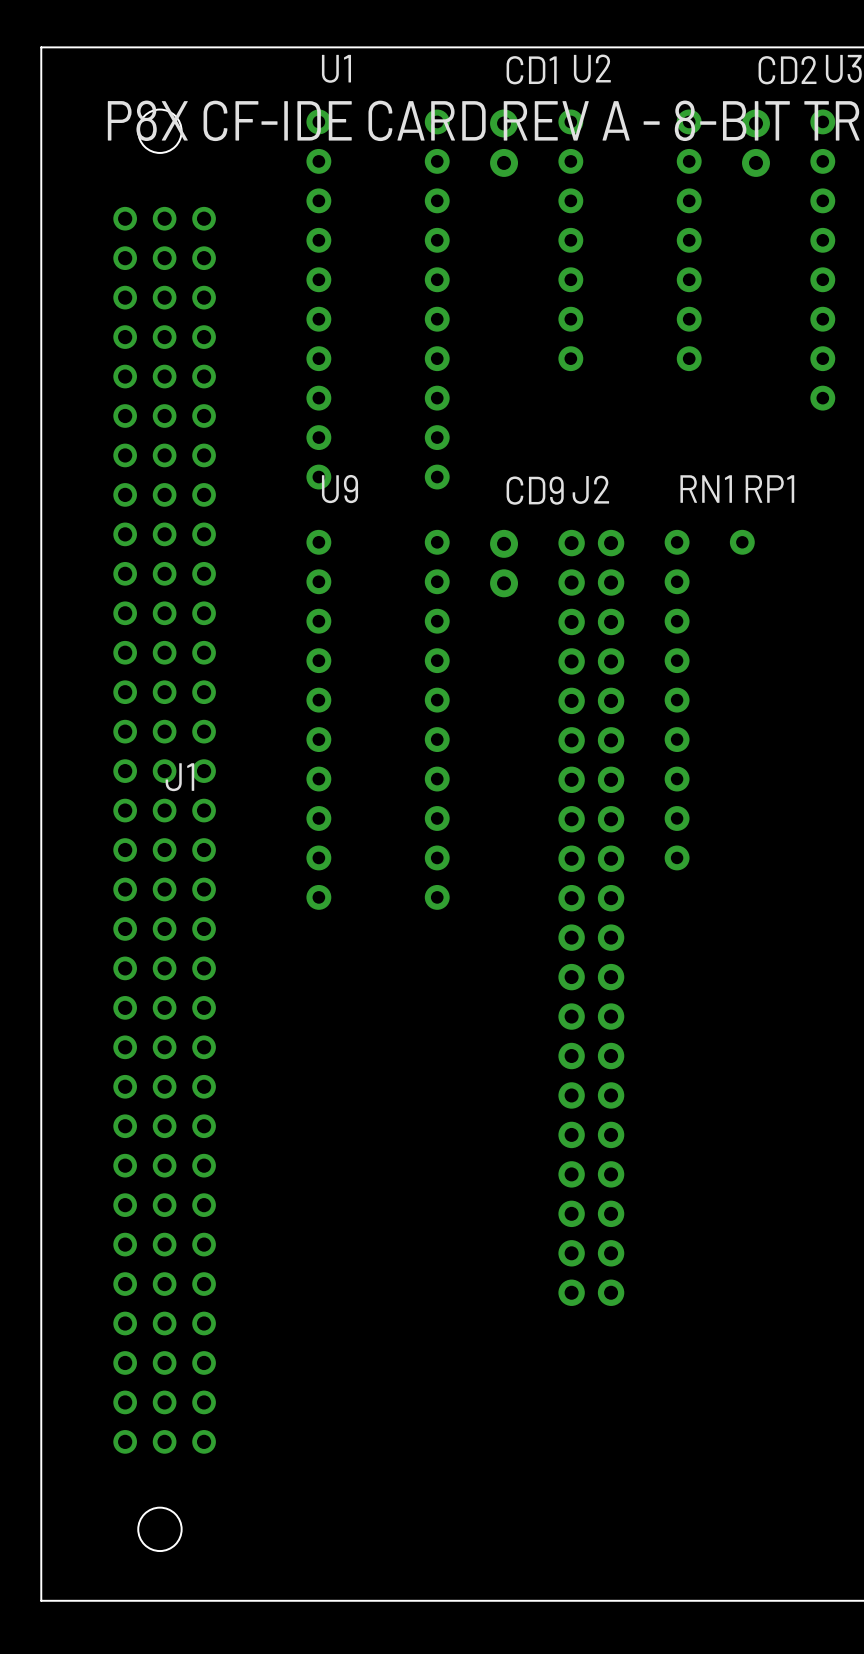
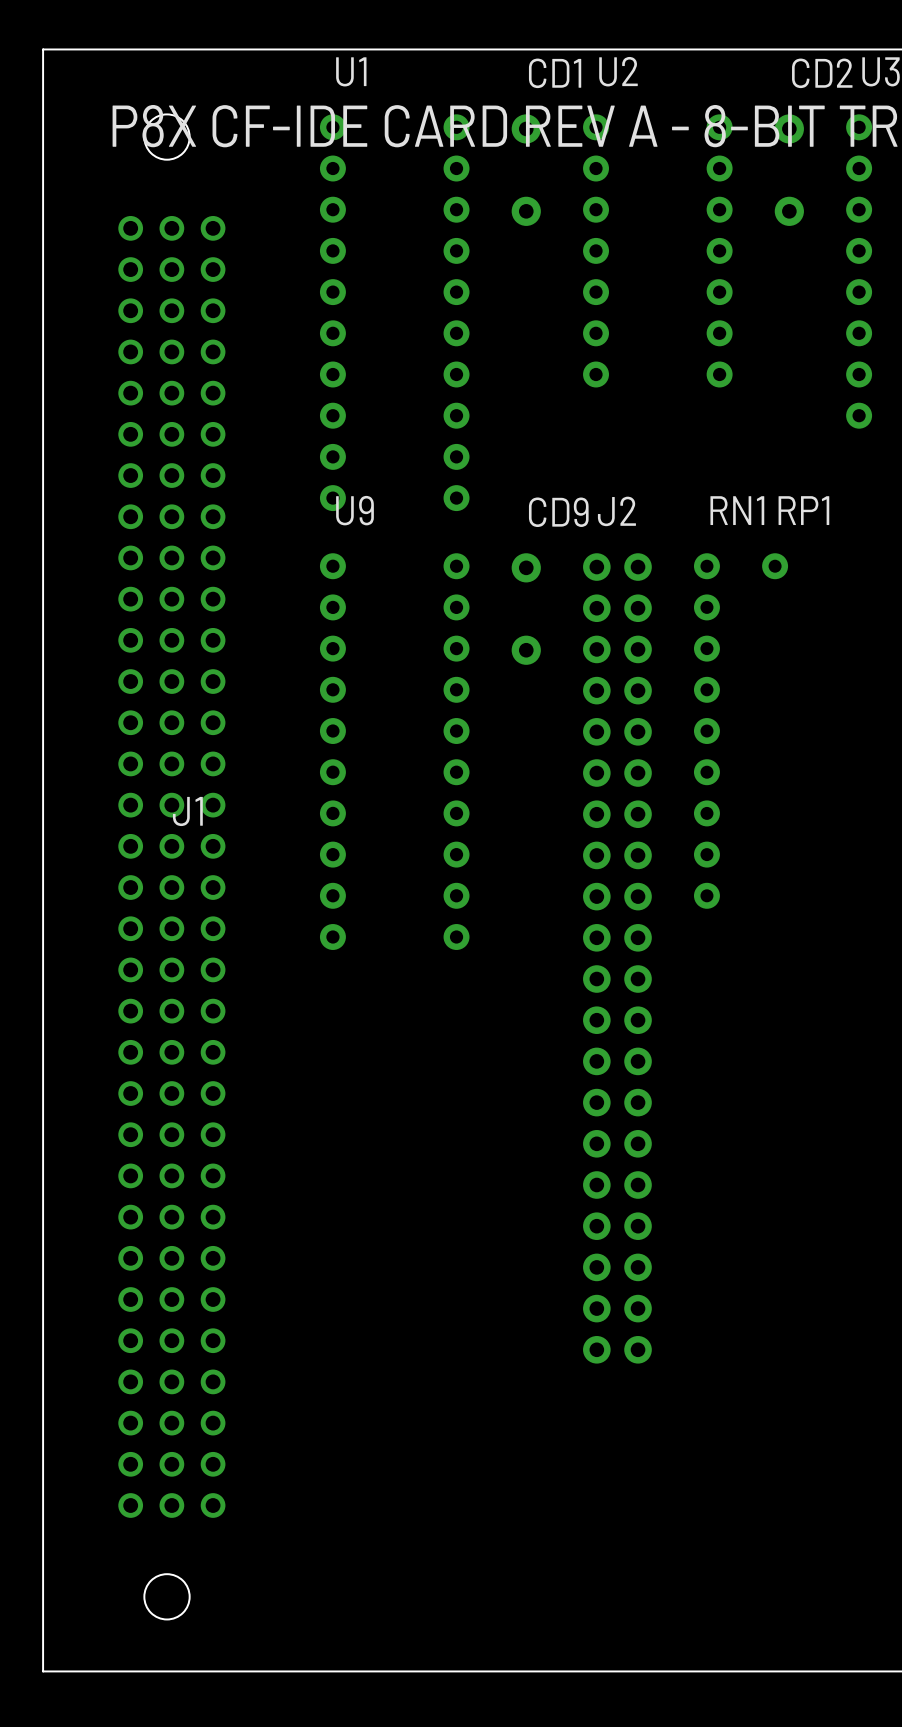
CD1 footprint: [490, 109, 519, 177] -> [511, 114, 541, 226]
CD2 footprint: [742, 109, 770, 177] -> [774, 114, 804, 226]
CD9 footprint: [490, 529, 519, 598] -> [511, 553, 541, 665]

